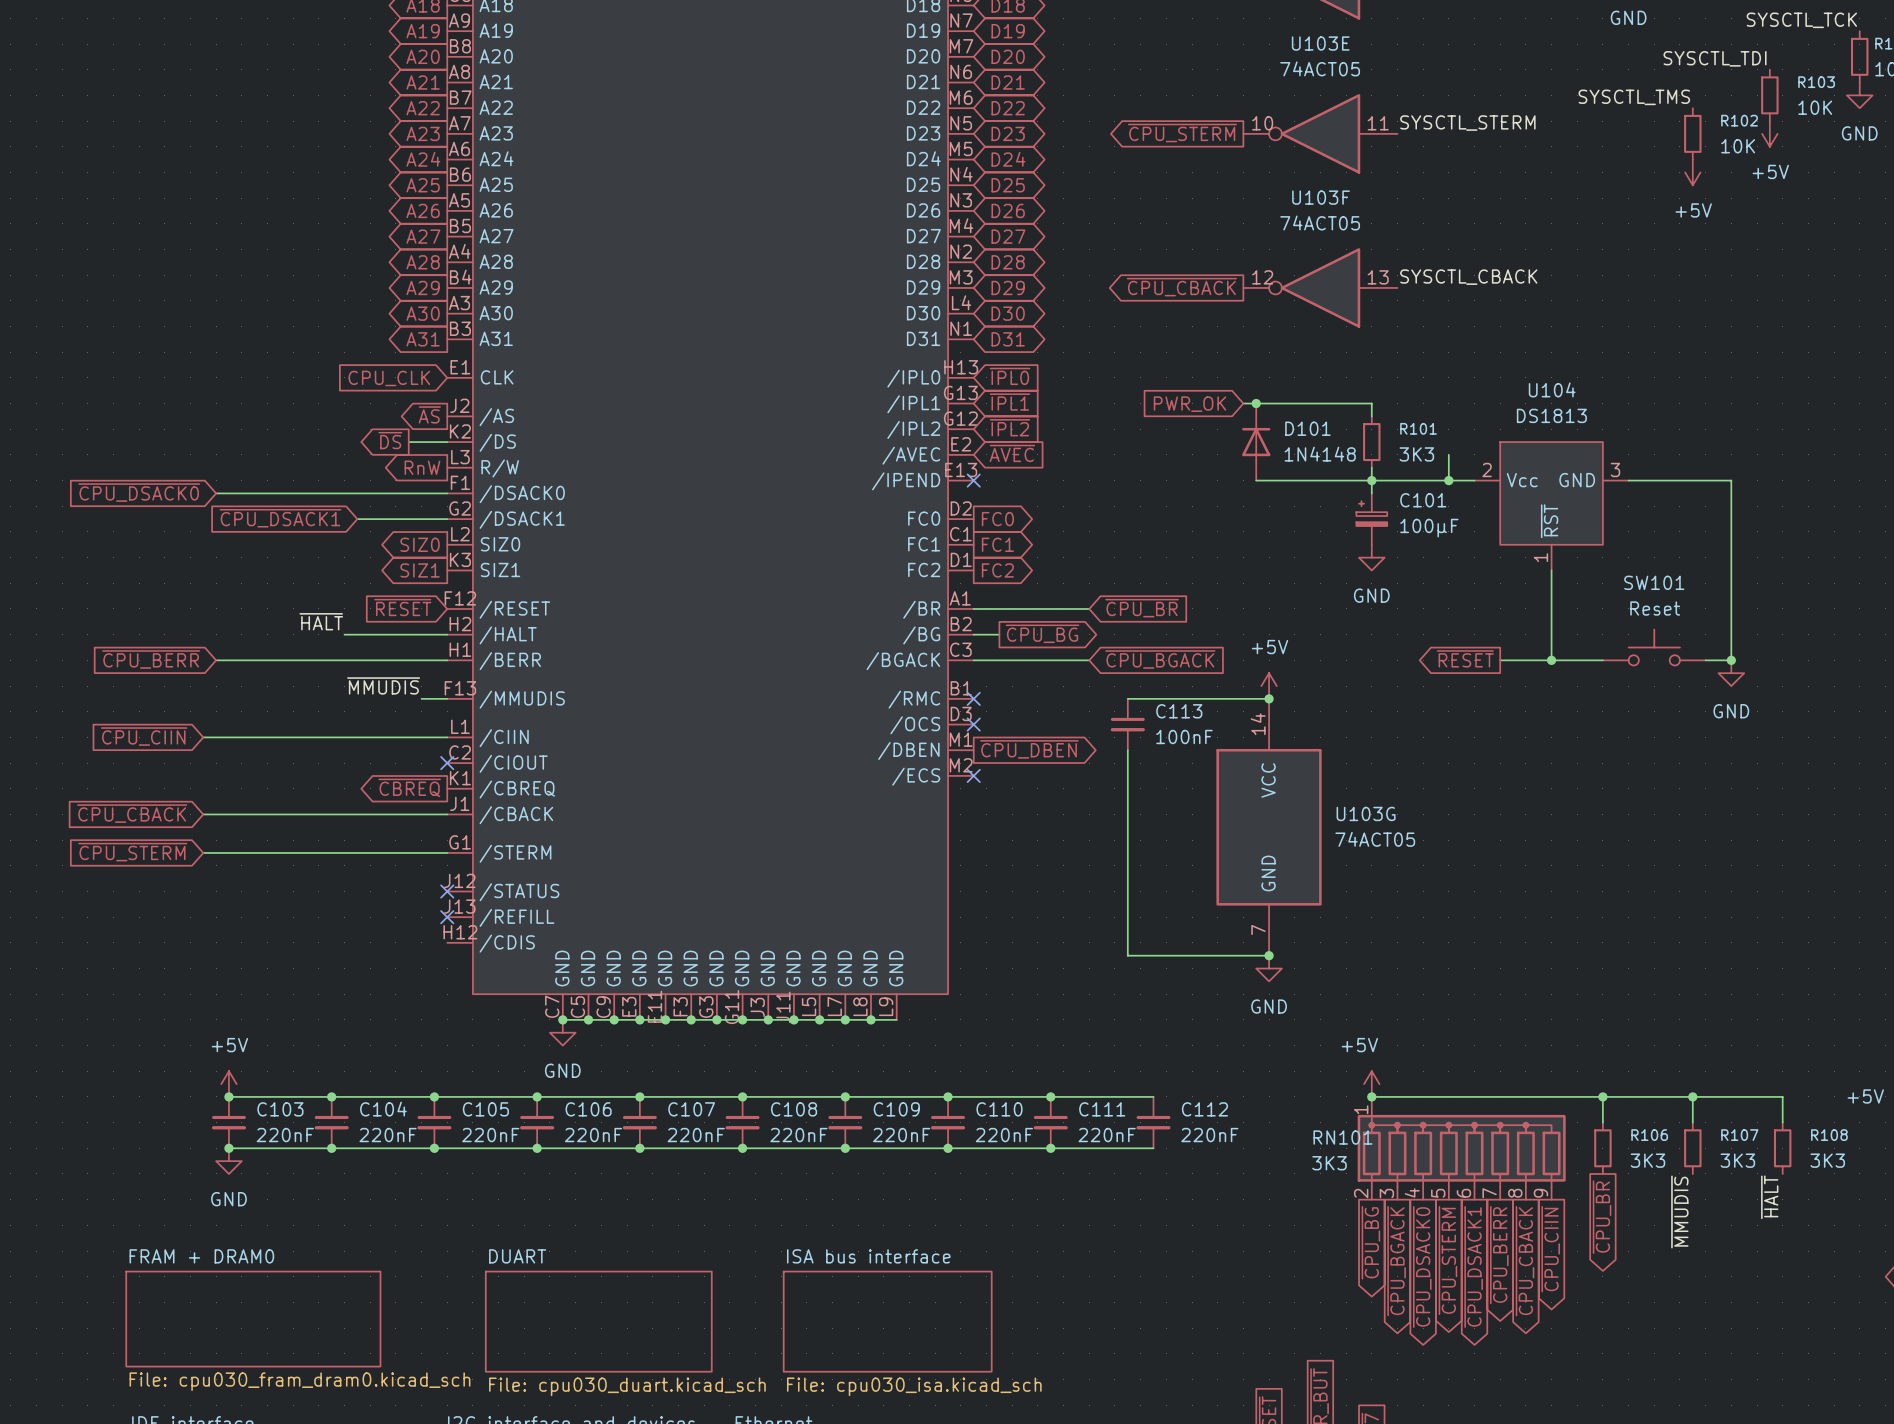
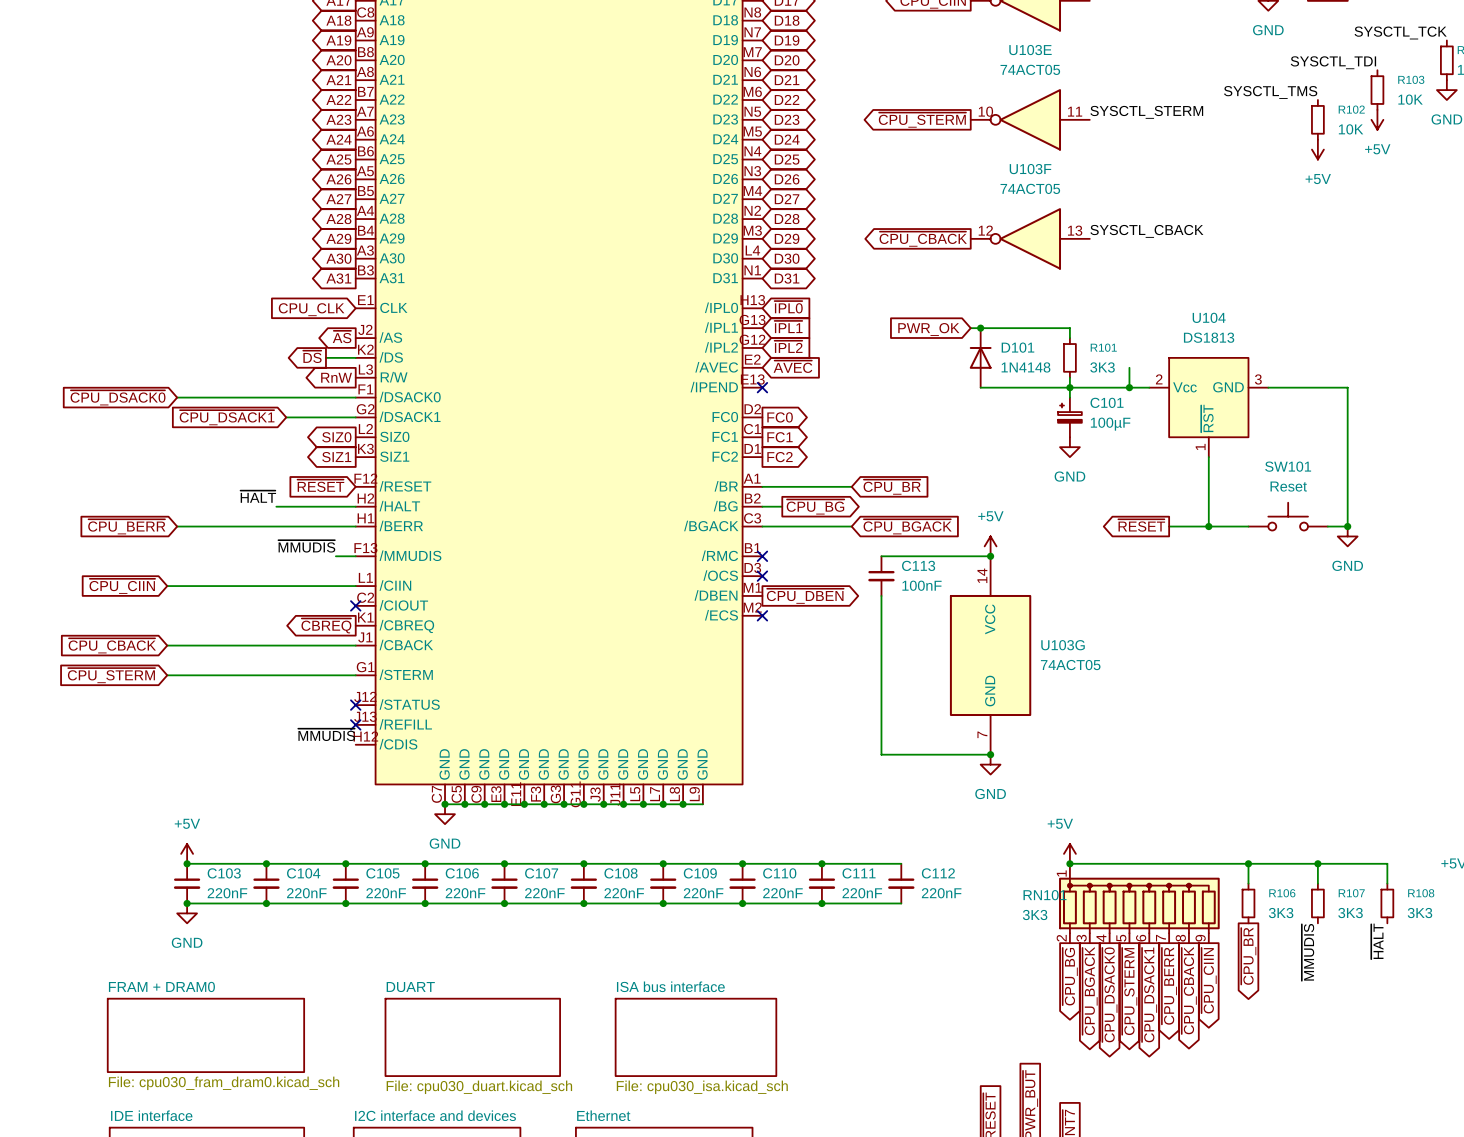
label: none -> ~{MMUDIS} (326, 734)

